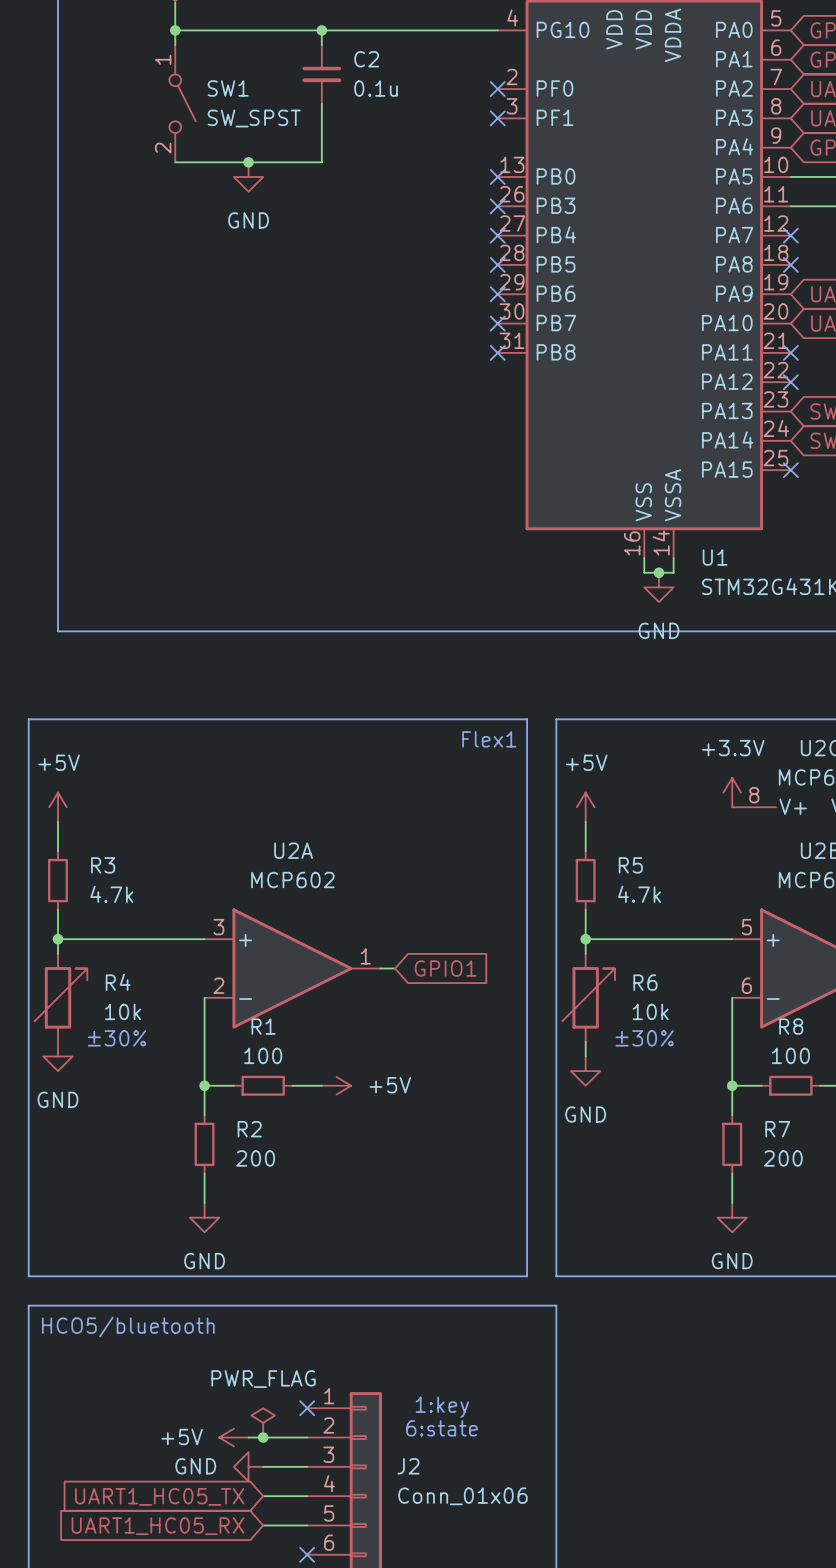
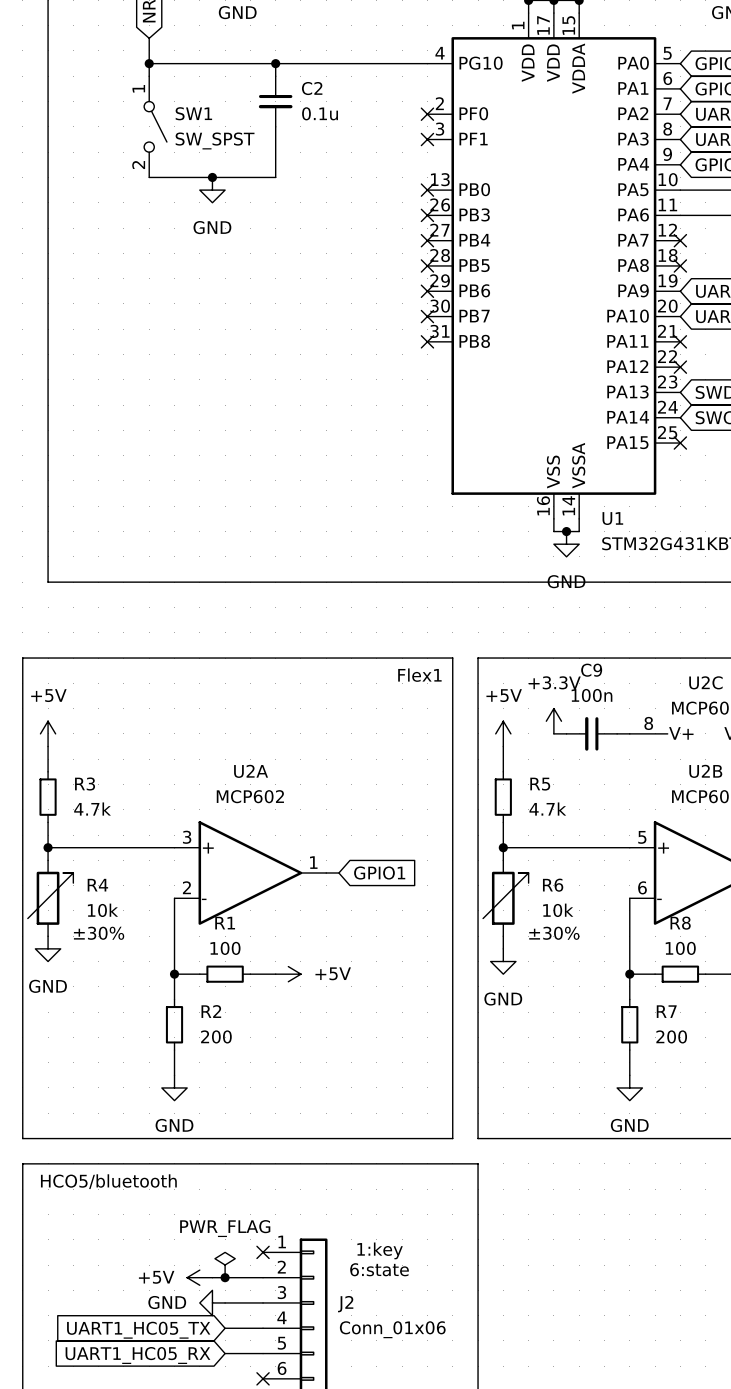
power symbol position: +3.3V (732, 792) -> +3.3V (553, 721)
wire: none -> (553, 733) (566, 733)
C9: none -> 100n (591, 733)
wire: none -> (617, 733) (629, 733)

